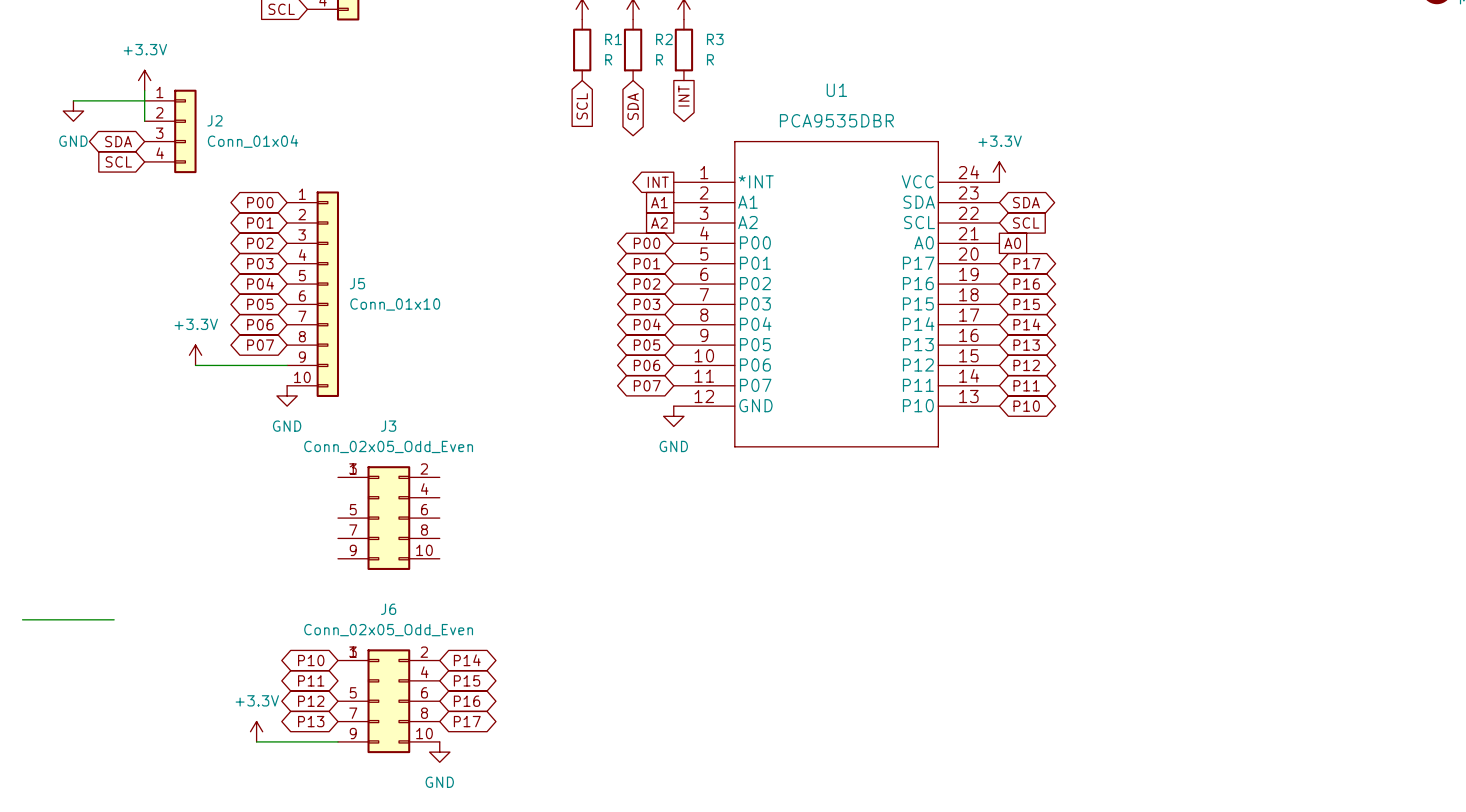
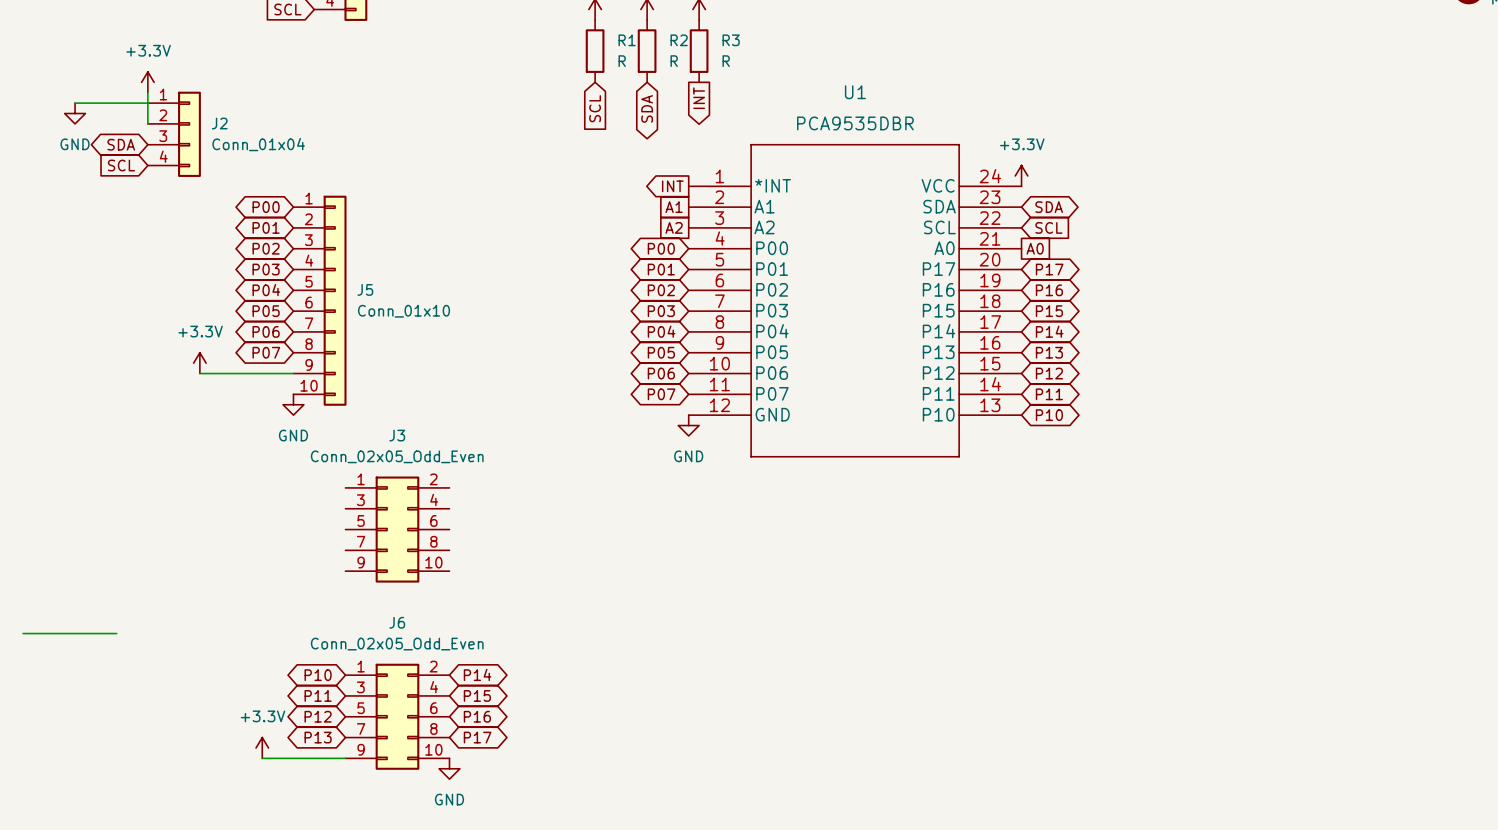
J3 symbol: [337, 466, 440, 570] -> [345, 476, 450, 583]
J6 symbol: [337, 649, 440, 754] -> [345, 663, 450, 770]

